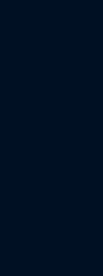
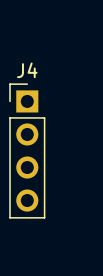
J4: none -> (27, 150)

